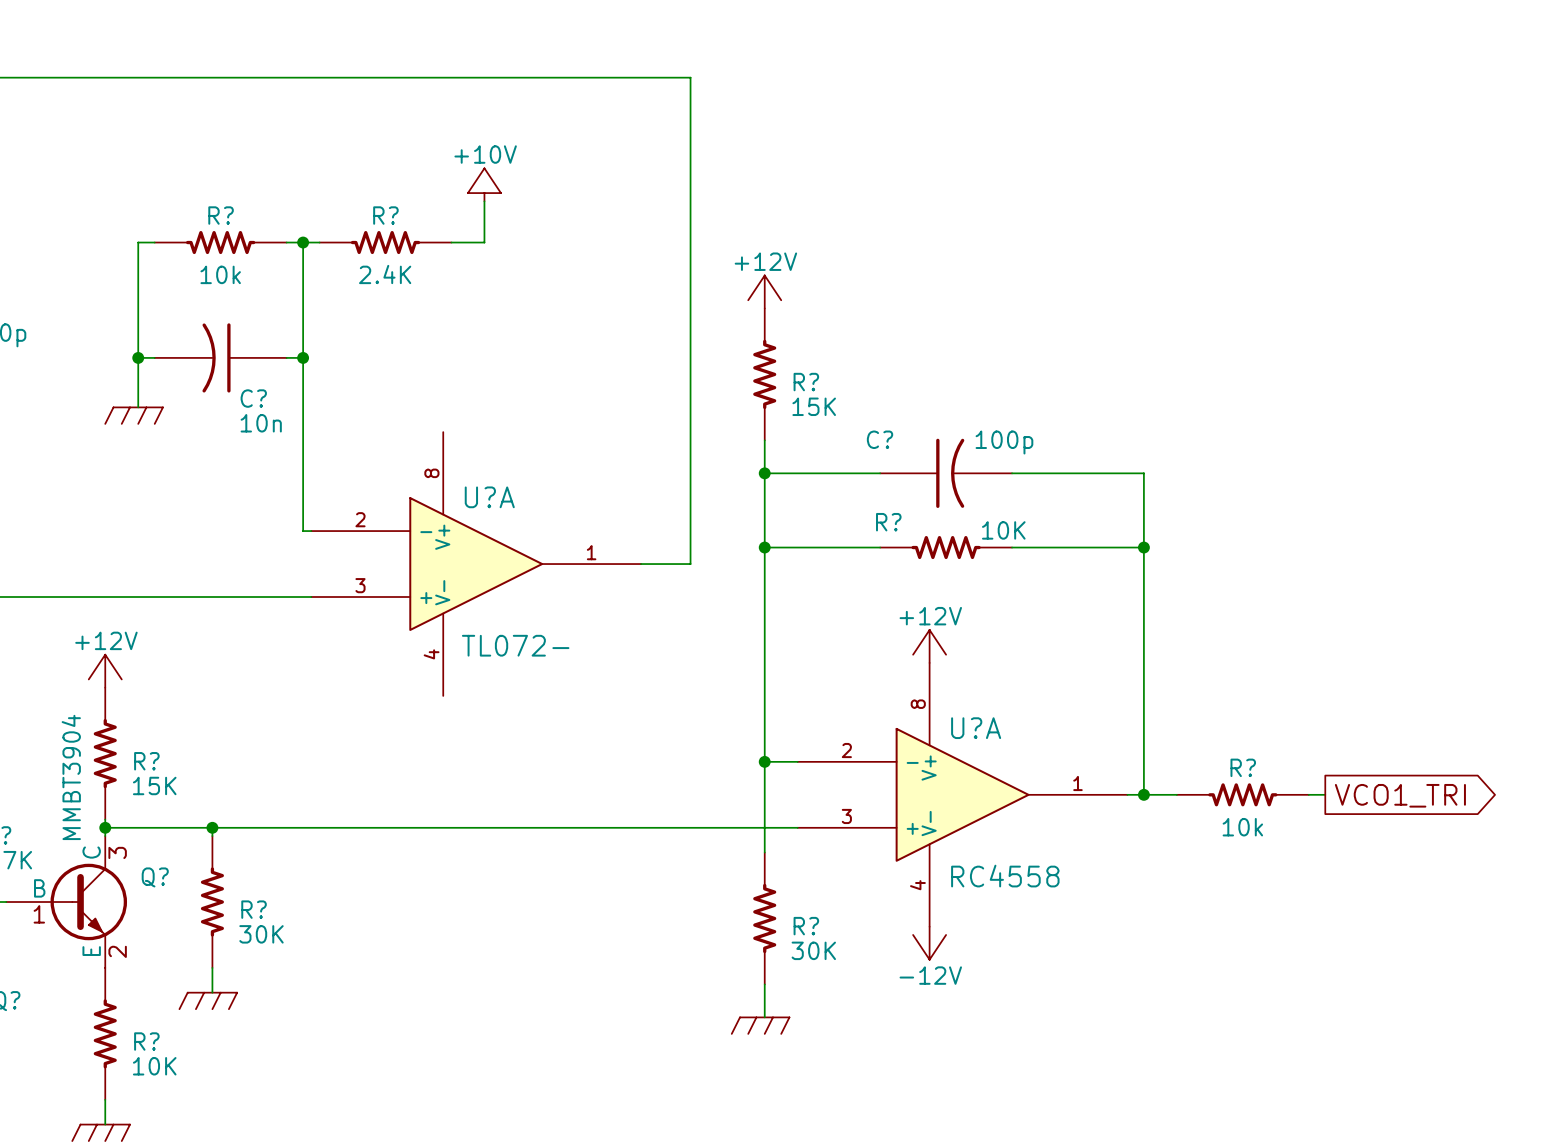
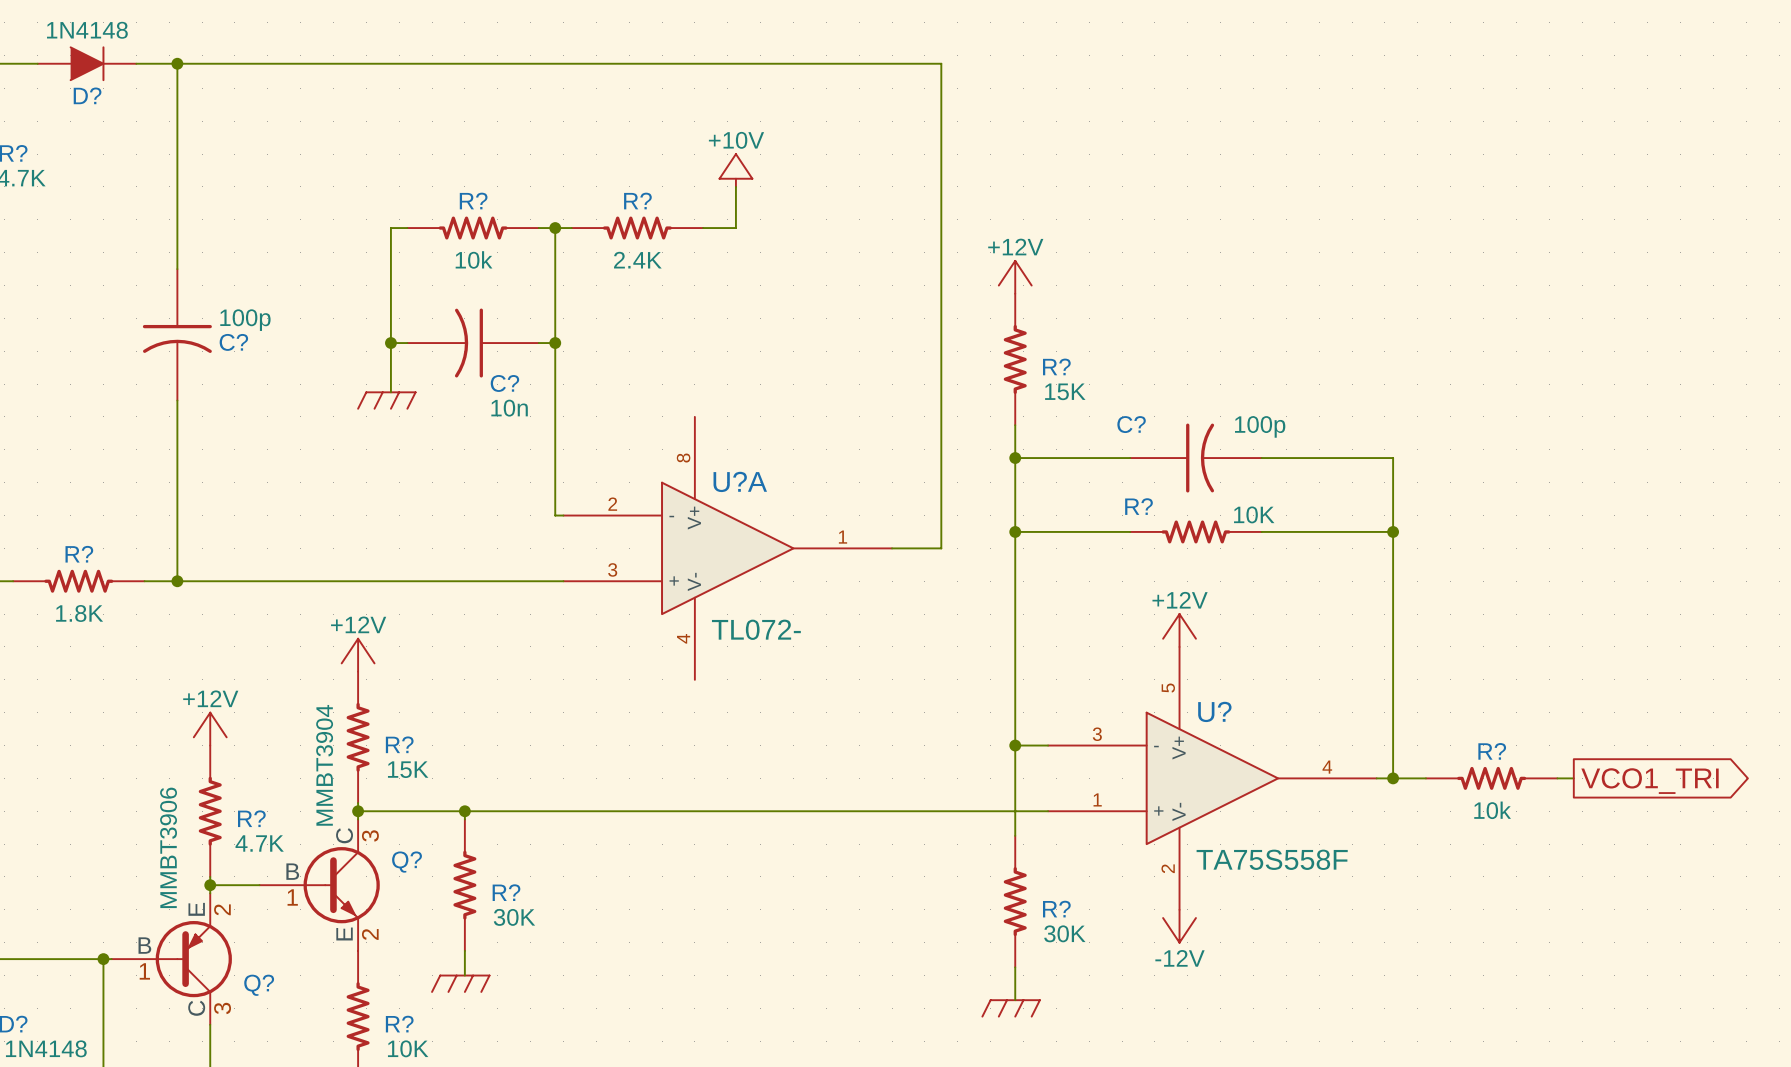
U?A pin number: 8 (918, 704) -> 5 (1168, 688)
U?A name: U?A (976, 728) -> U? (1214, 711)
U?A pin number: 2 (846, 750) -> 3 (1097, 734)
U?A pin number: 1 (1077, 783) -> 4 (1327, 767)
U?A pin number: 3 (846, 816) -> 1 (1097, 799)
U?A value: RC4558 (1005, 876) -> TA75S558F (1272, 859)
U?A pin number: 4 (917, 885) -> 2 (1168, 868)

